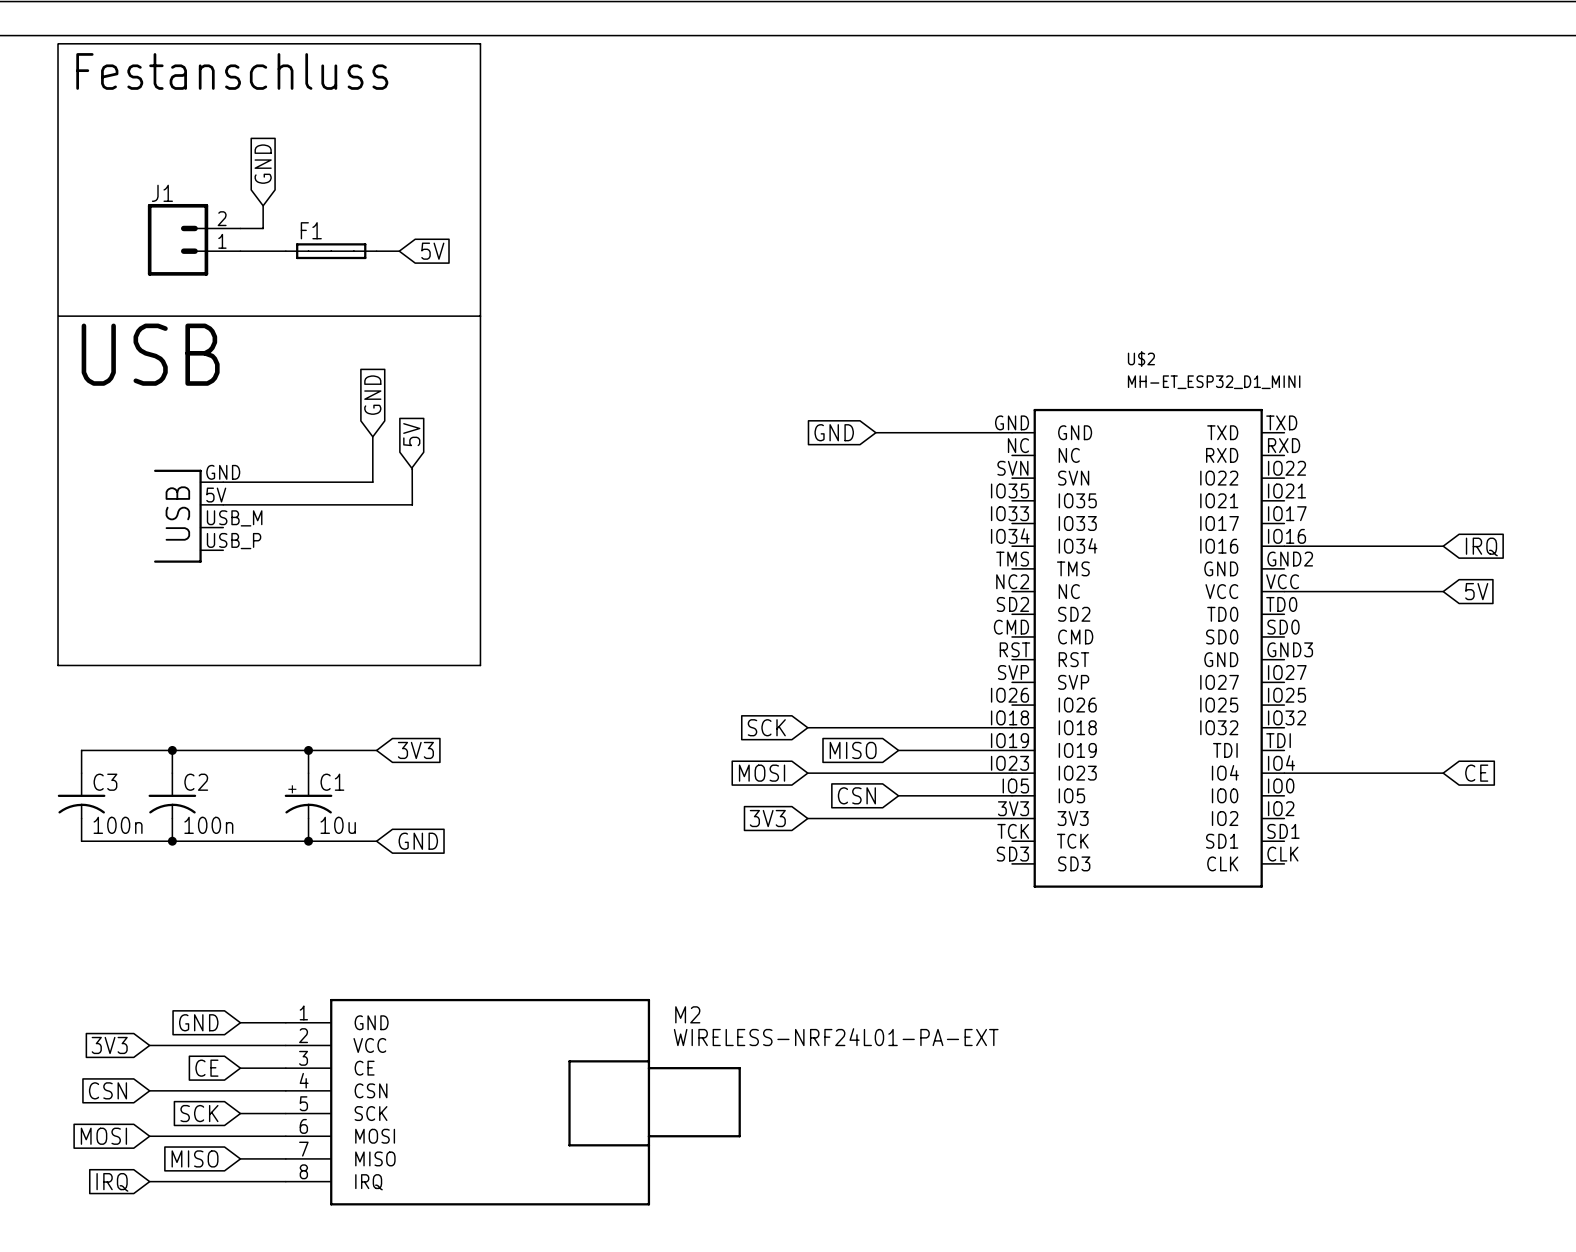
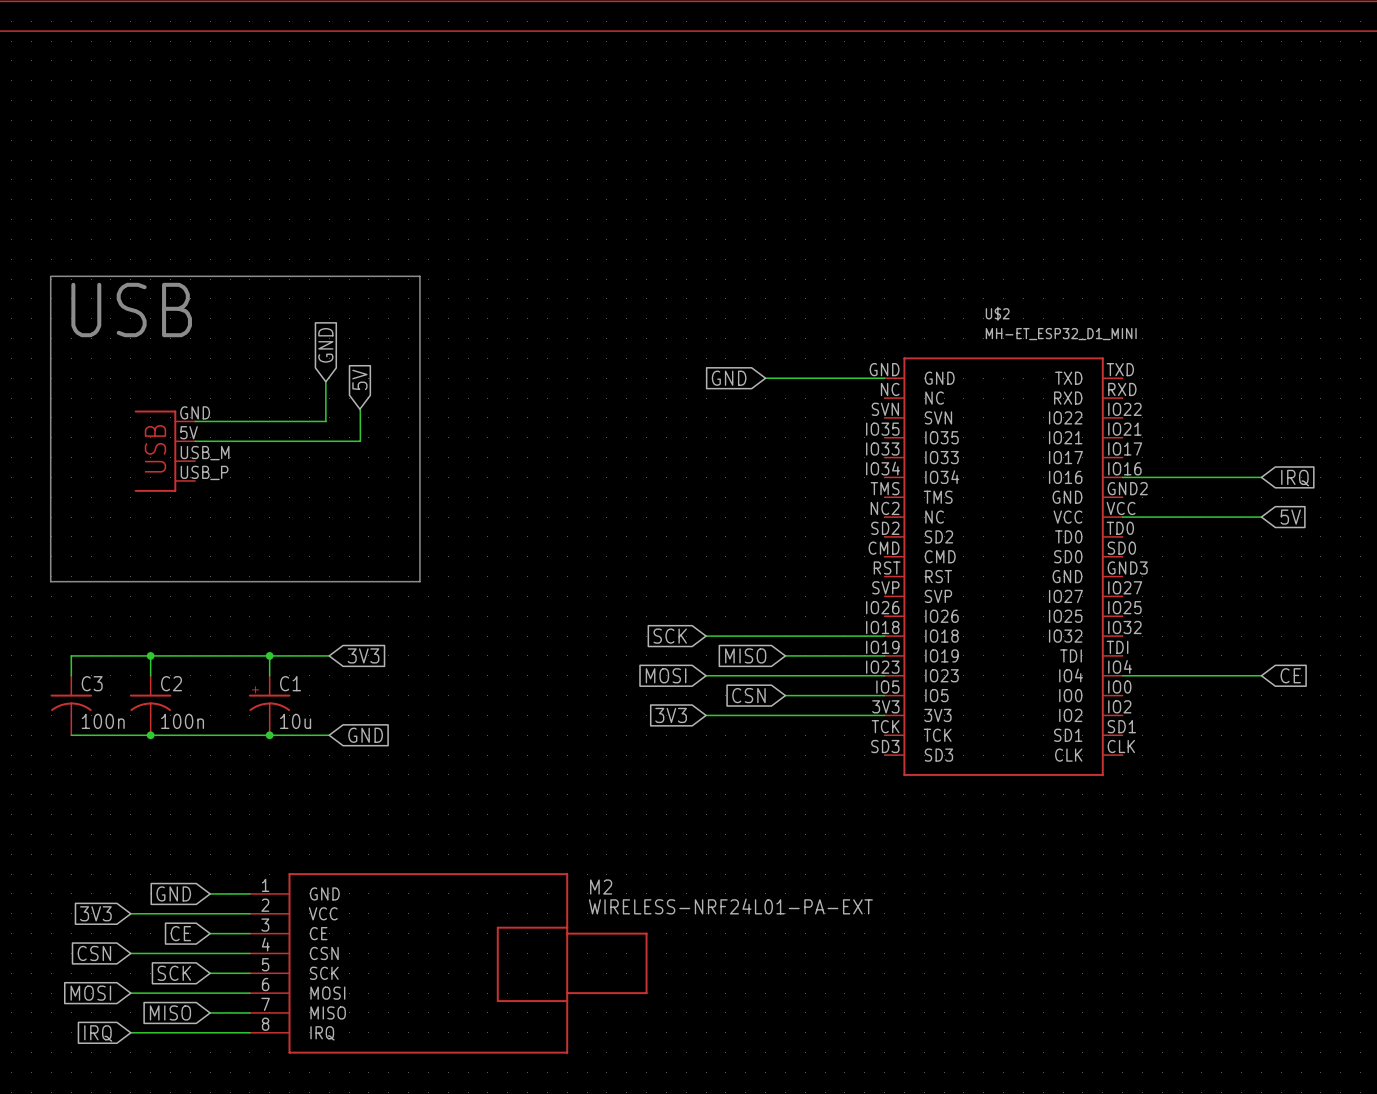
line: (58, 43) (480, 43) (480, 316) -> none
line: (58, 43) (58, 316) -> none
text: Festanschluss (232, 71) -> none
global label: GND (263, 164) -> none
wire: (263, 205) (263, 228) (240, 228) -> none
J1: (194, 239) -> none
wire: (240, 251) (285, 251) -> none
F1: (331, 251) -> none
wire: (376, 251) (399, 251) -> none
global label: 5V (432, 251) -> none

